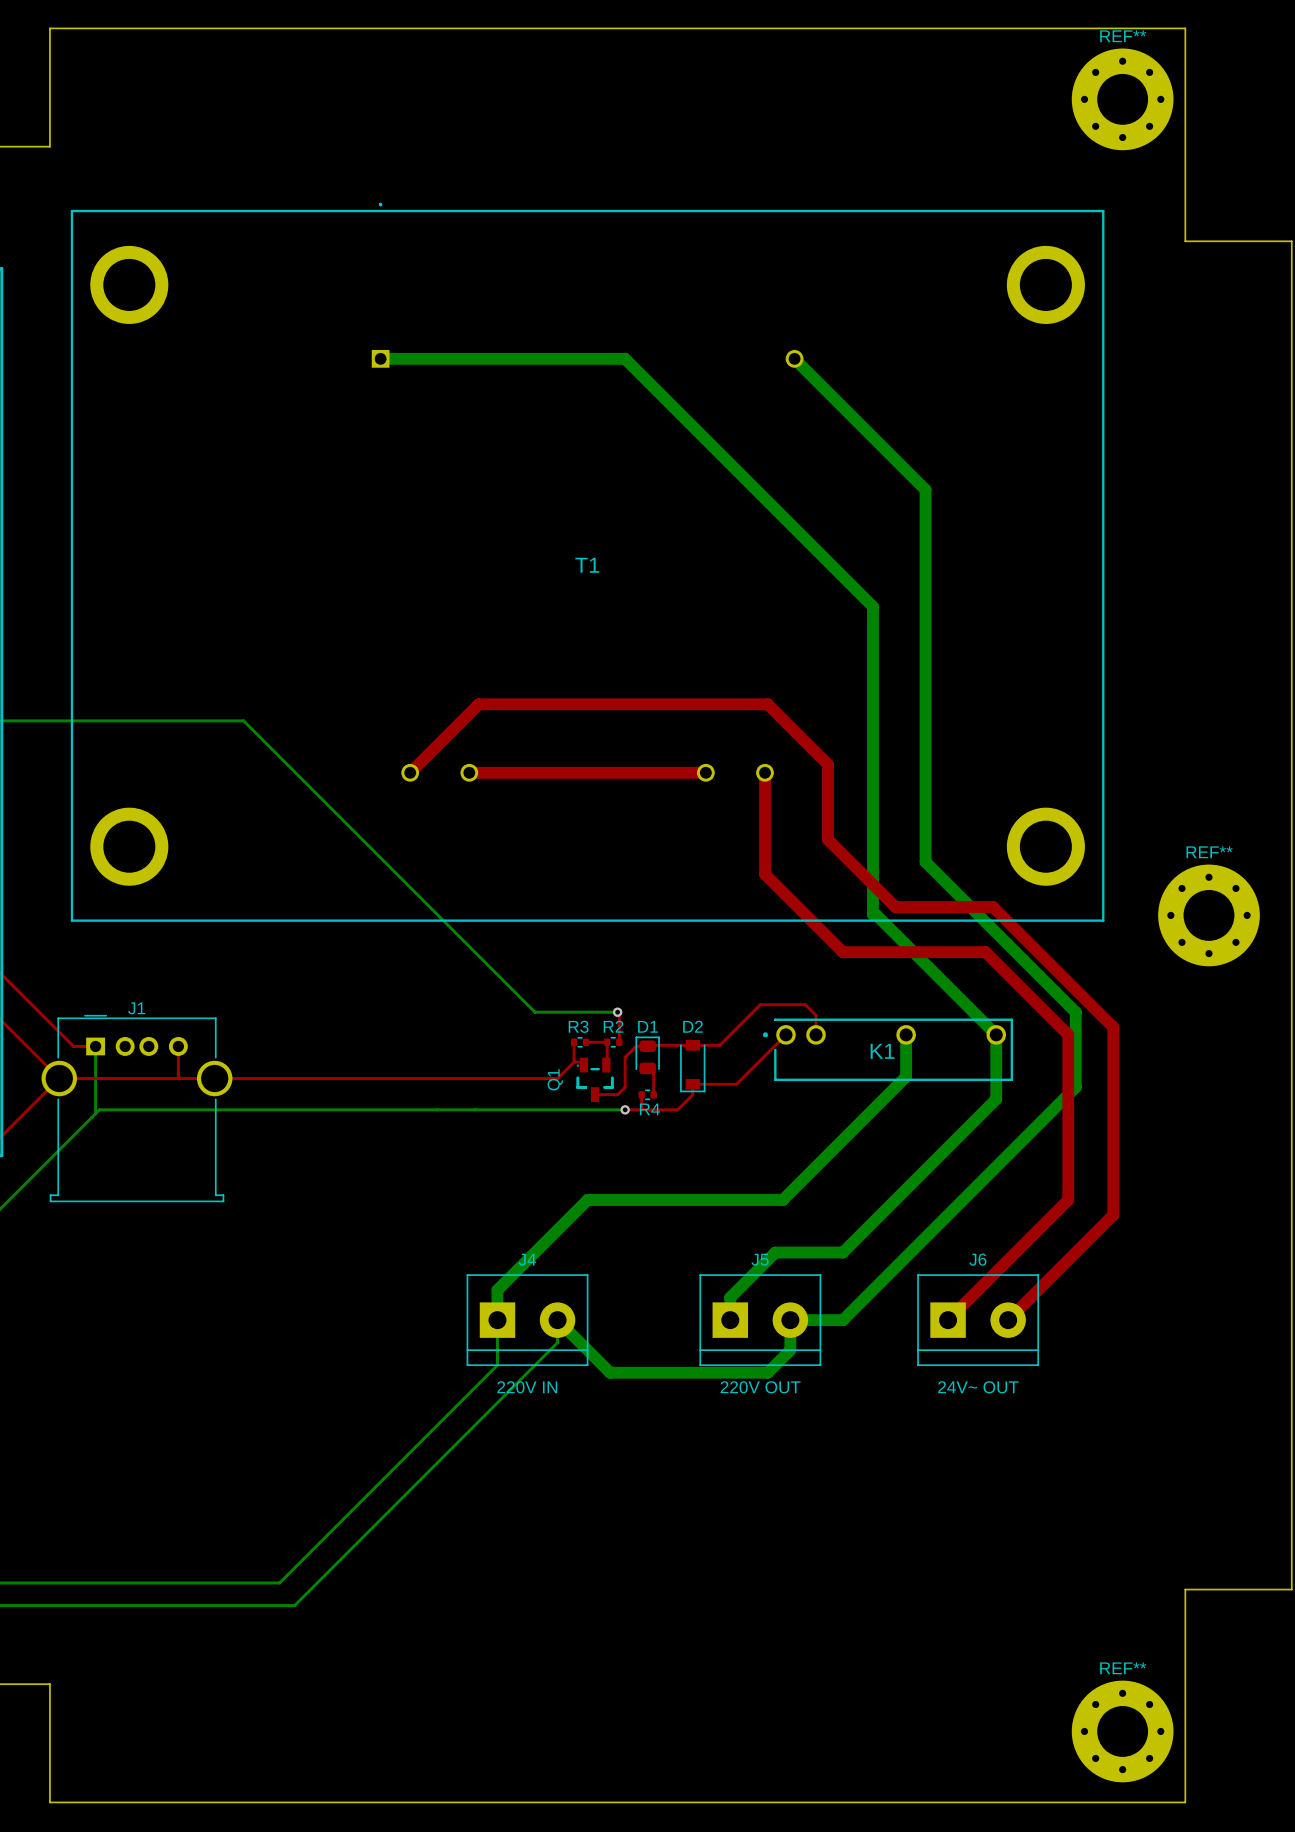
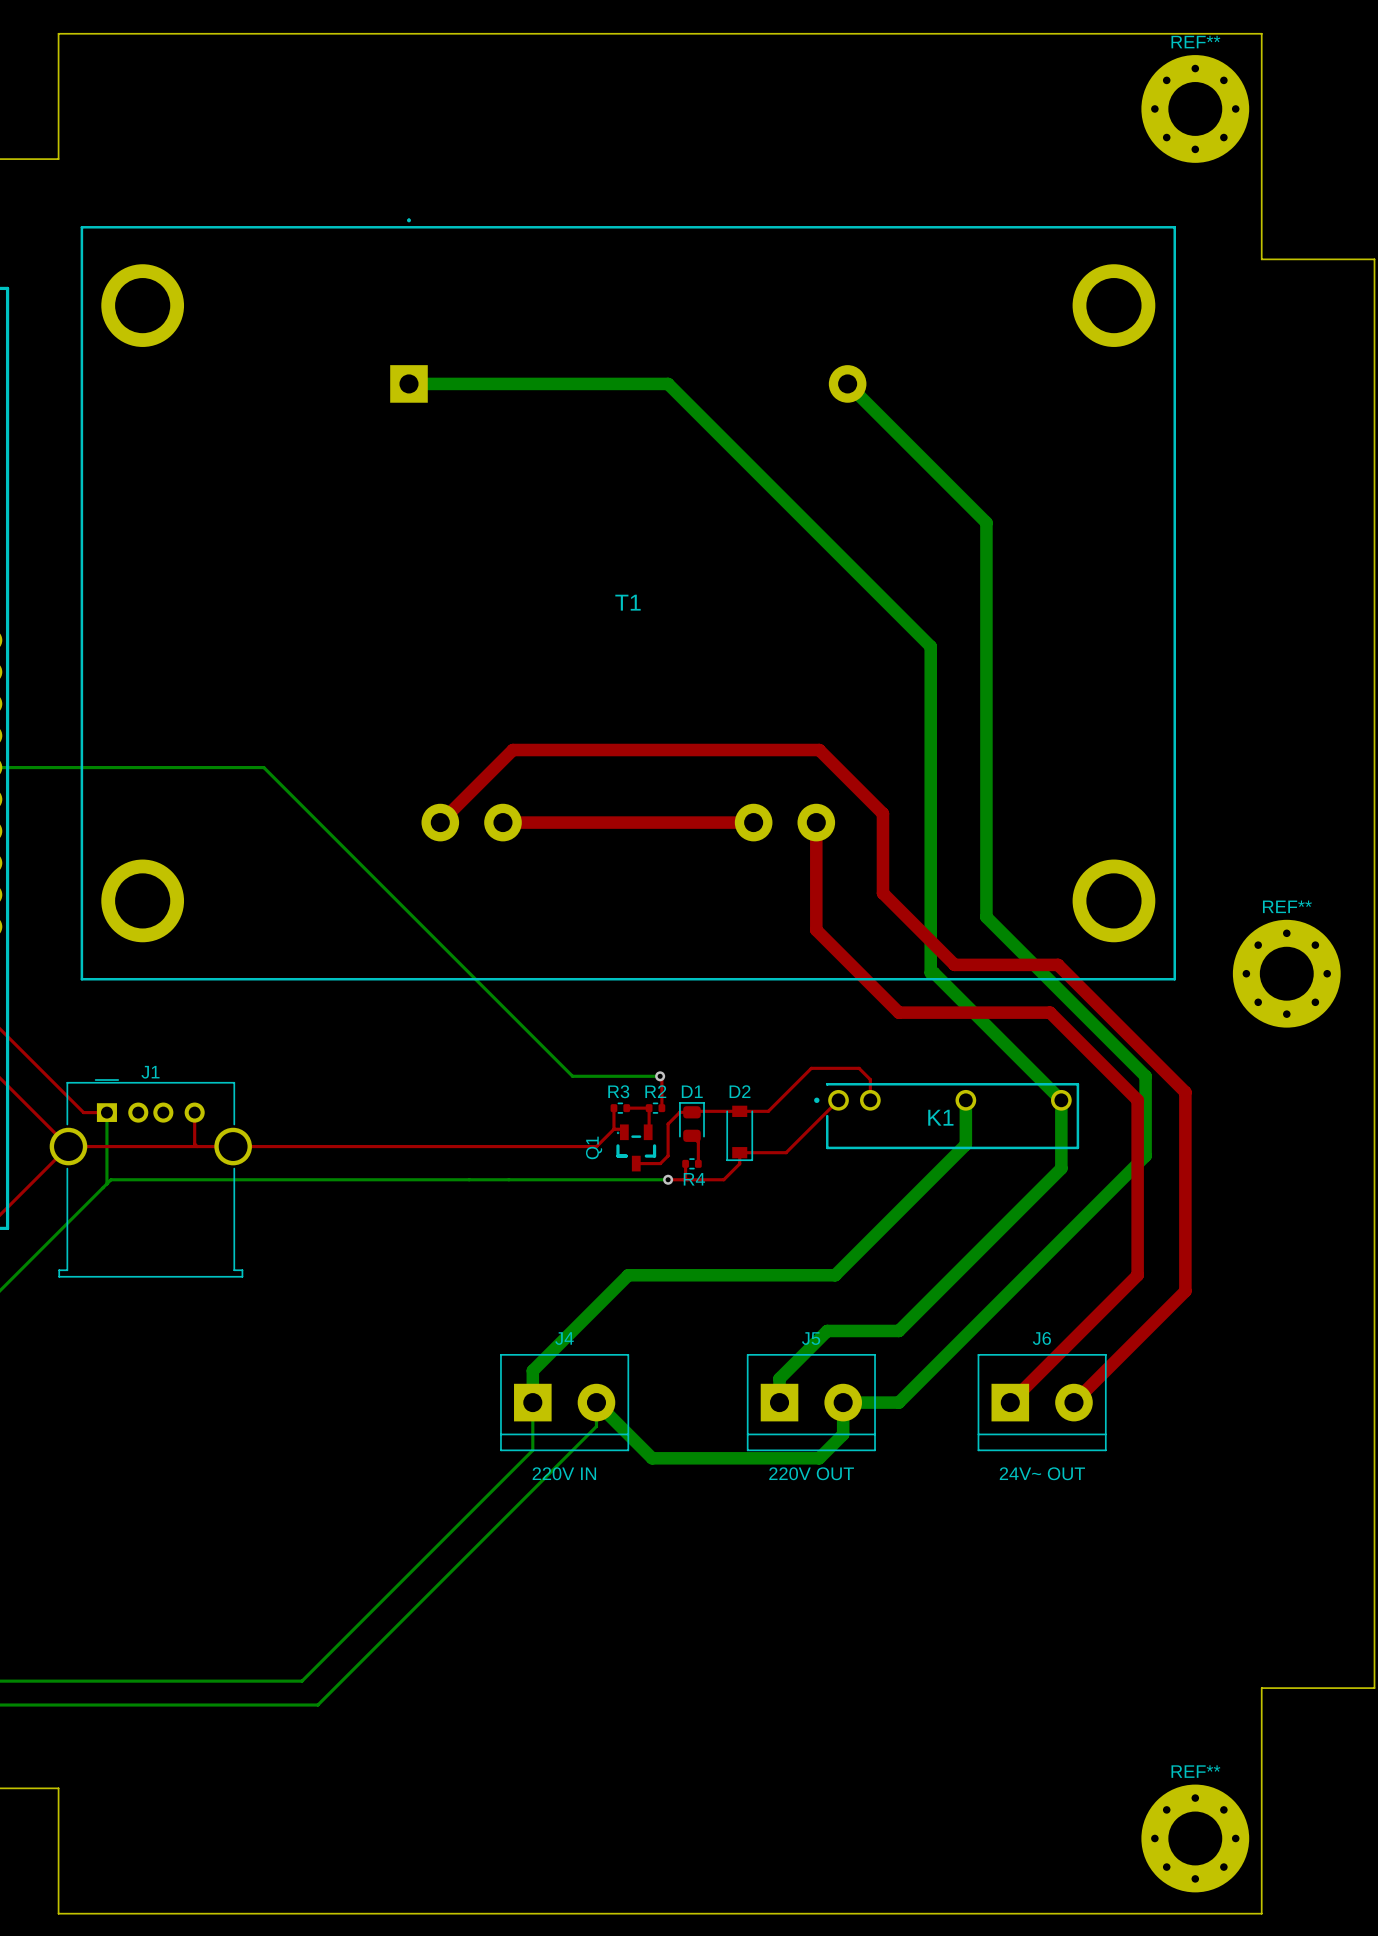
T1 footprint: [70, 202, 1105, 922] -> [80, 218, 1176, 981]

